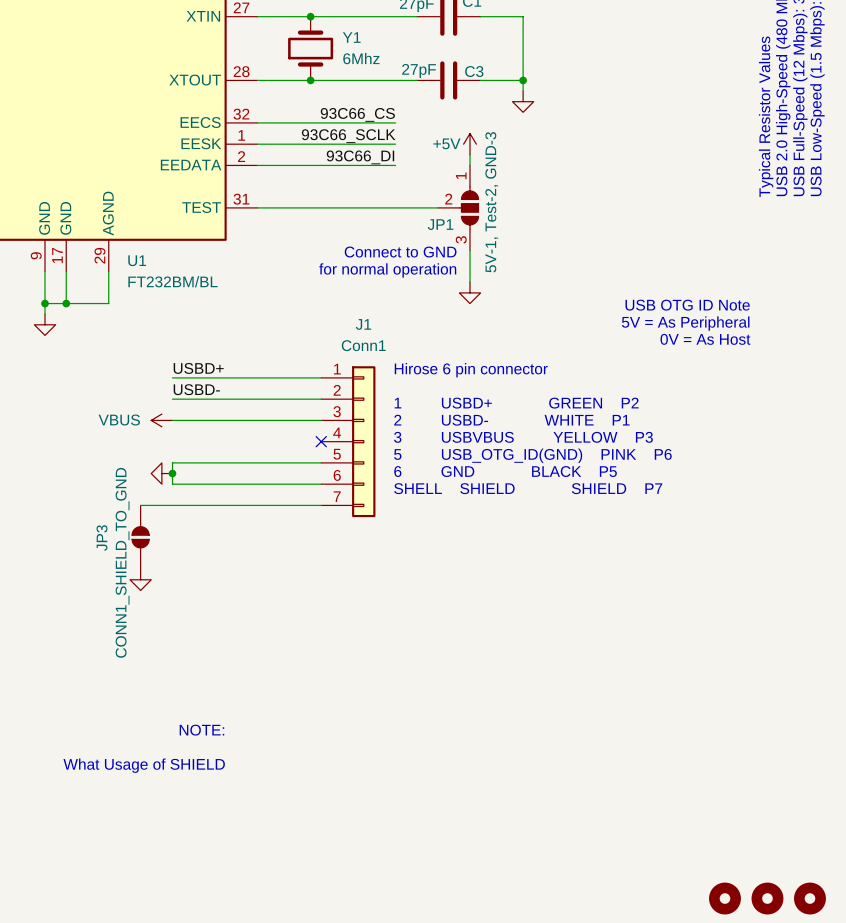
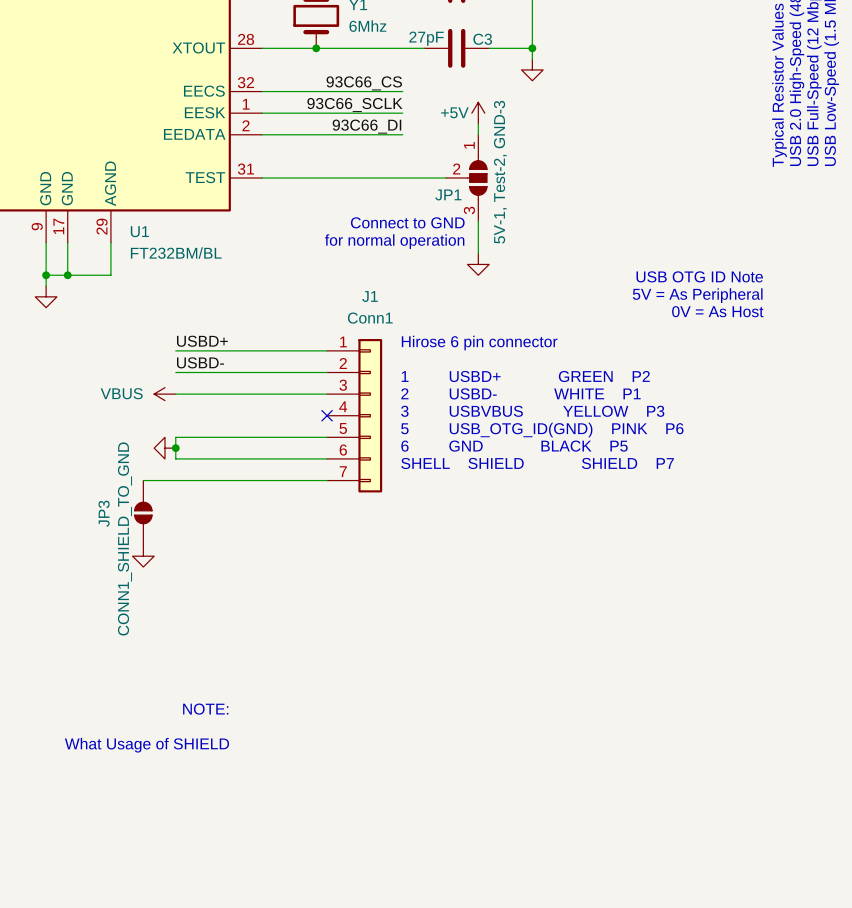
part: (724, 898) -> none
part: (767, 898) -> none
part: (809, 898) -> none

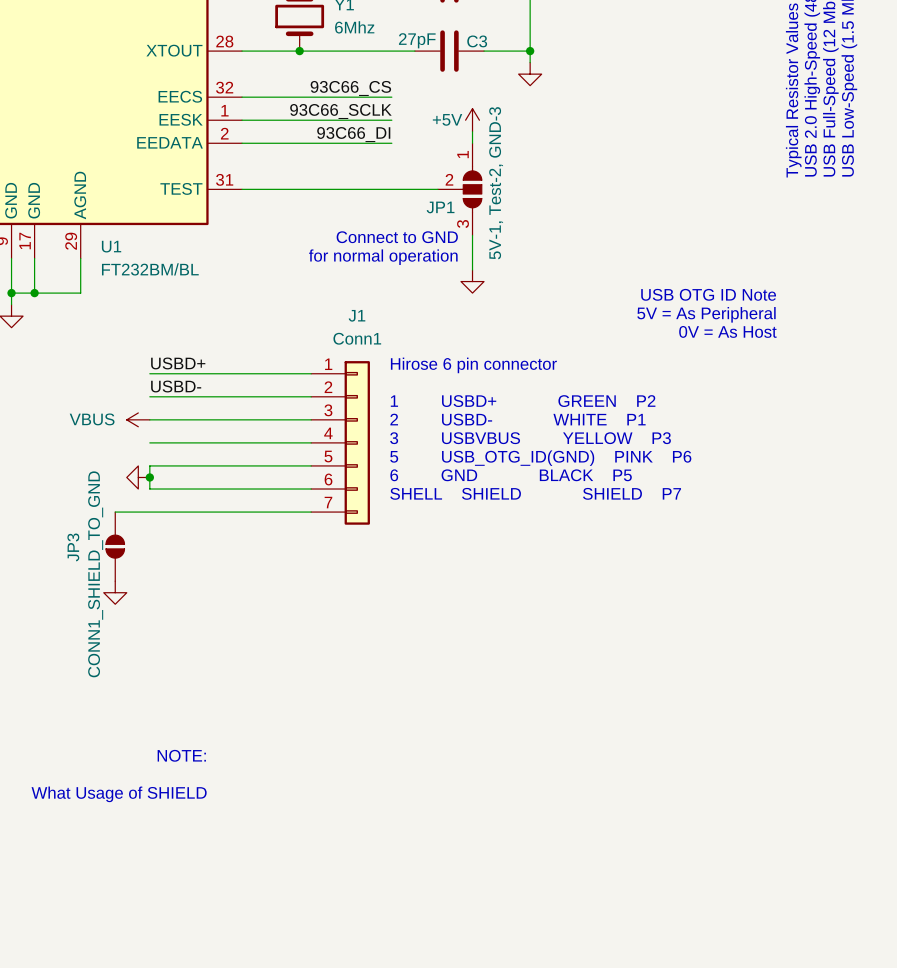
wire: none -> (149, 442) (311, 442)
no-connect mark: (327, 415) -> none

